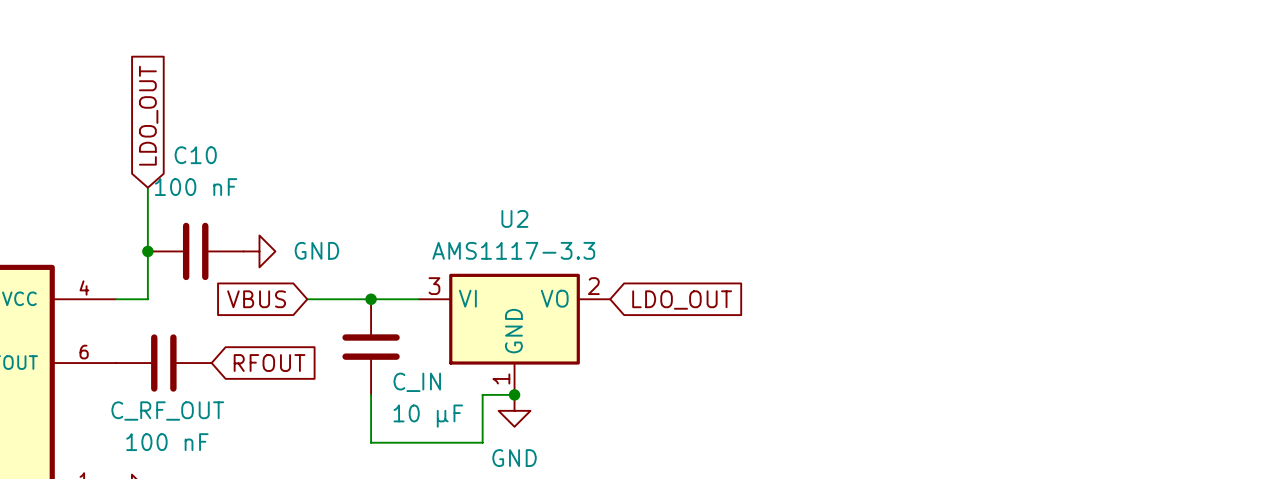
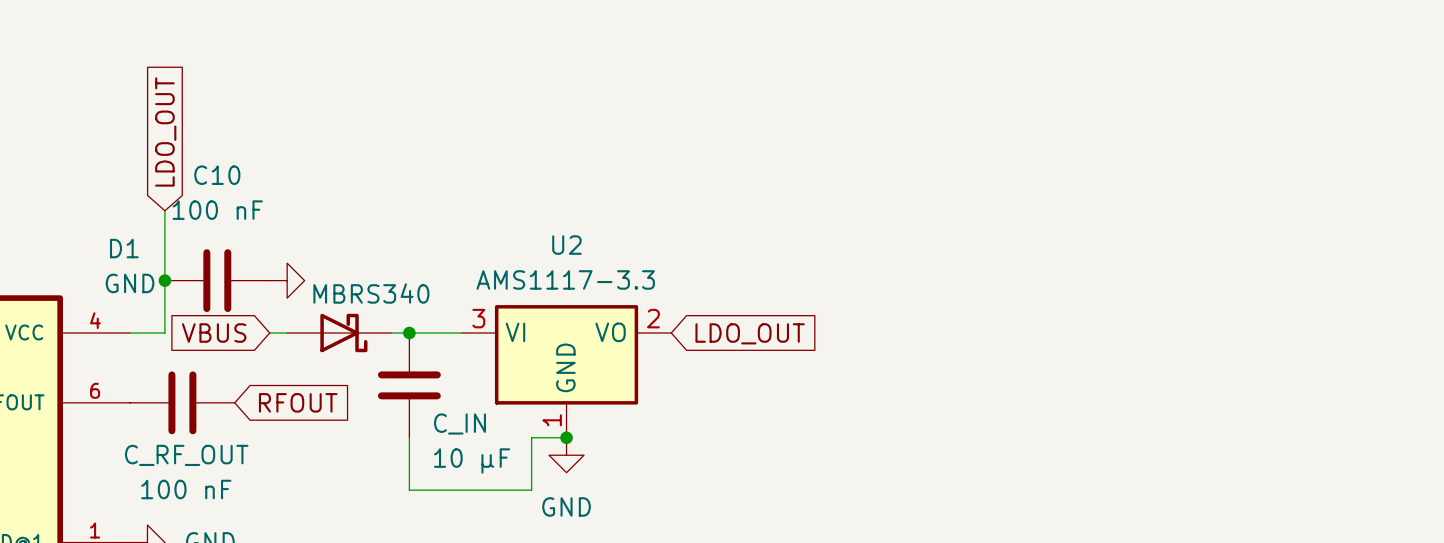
power symbol text position: GND (316, 250) -> GND (130, 283)
global label position: VBUS (256, 299) -> VBUS (214, 333)
D1: none -> MBRS340 (339, 333)

